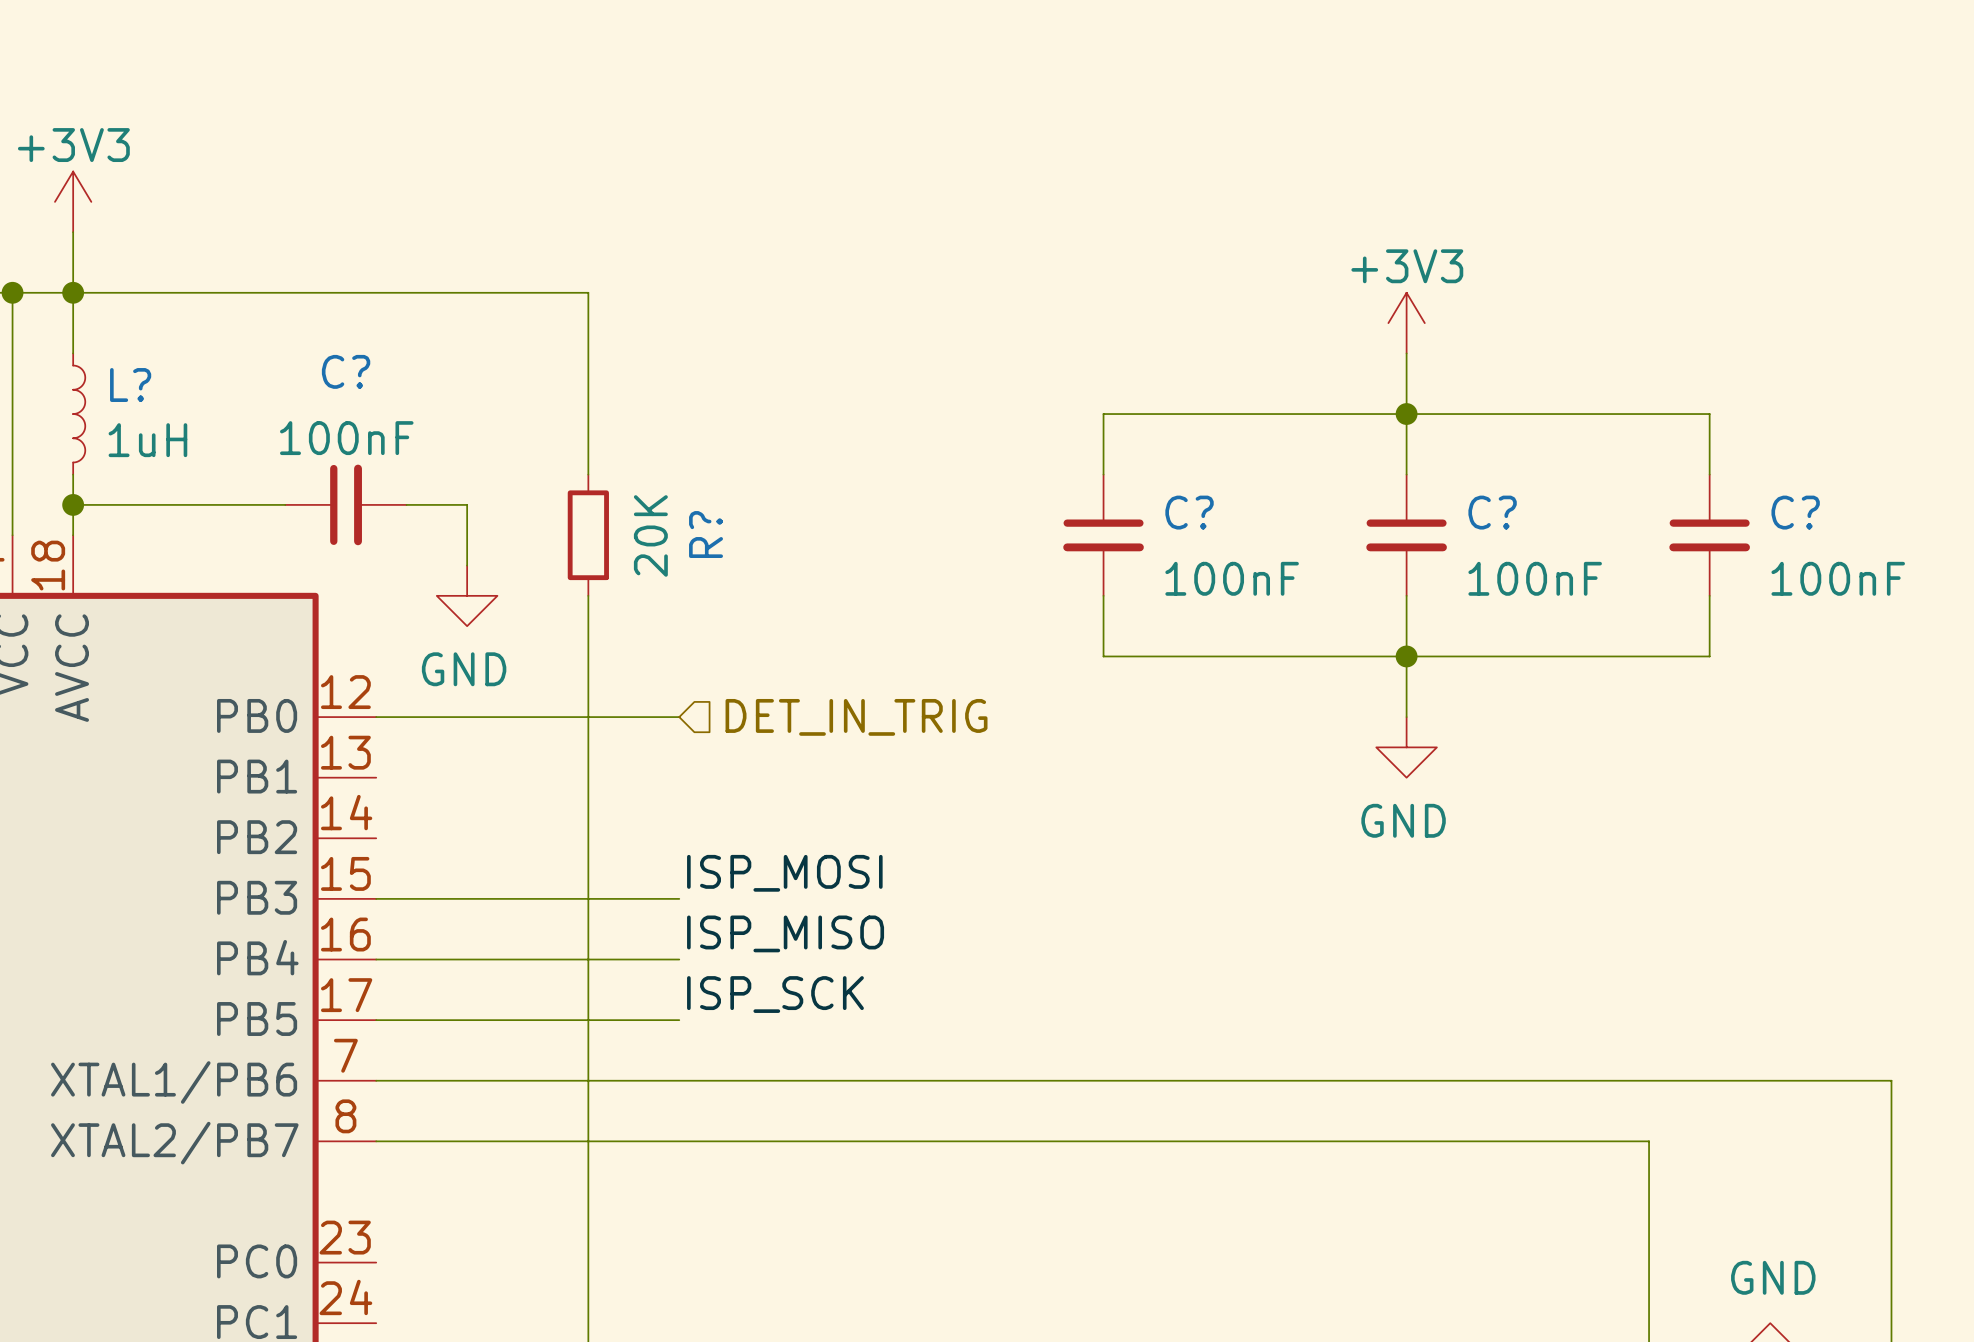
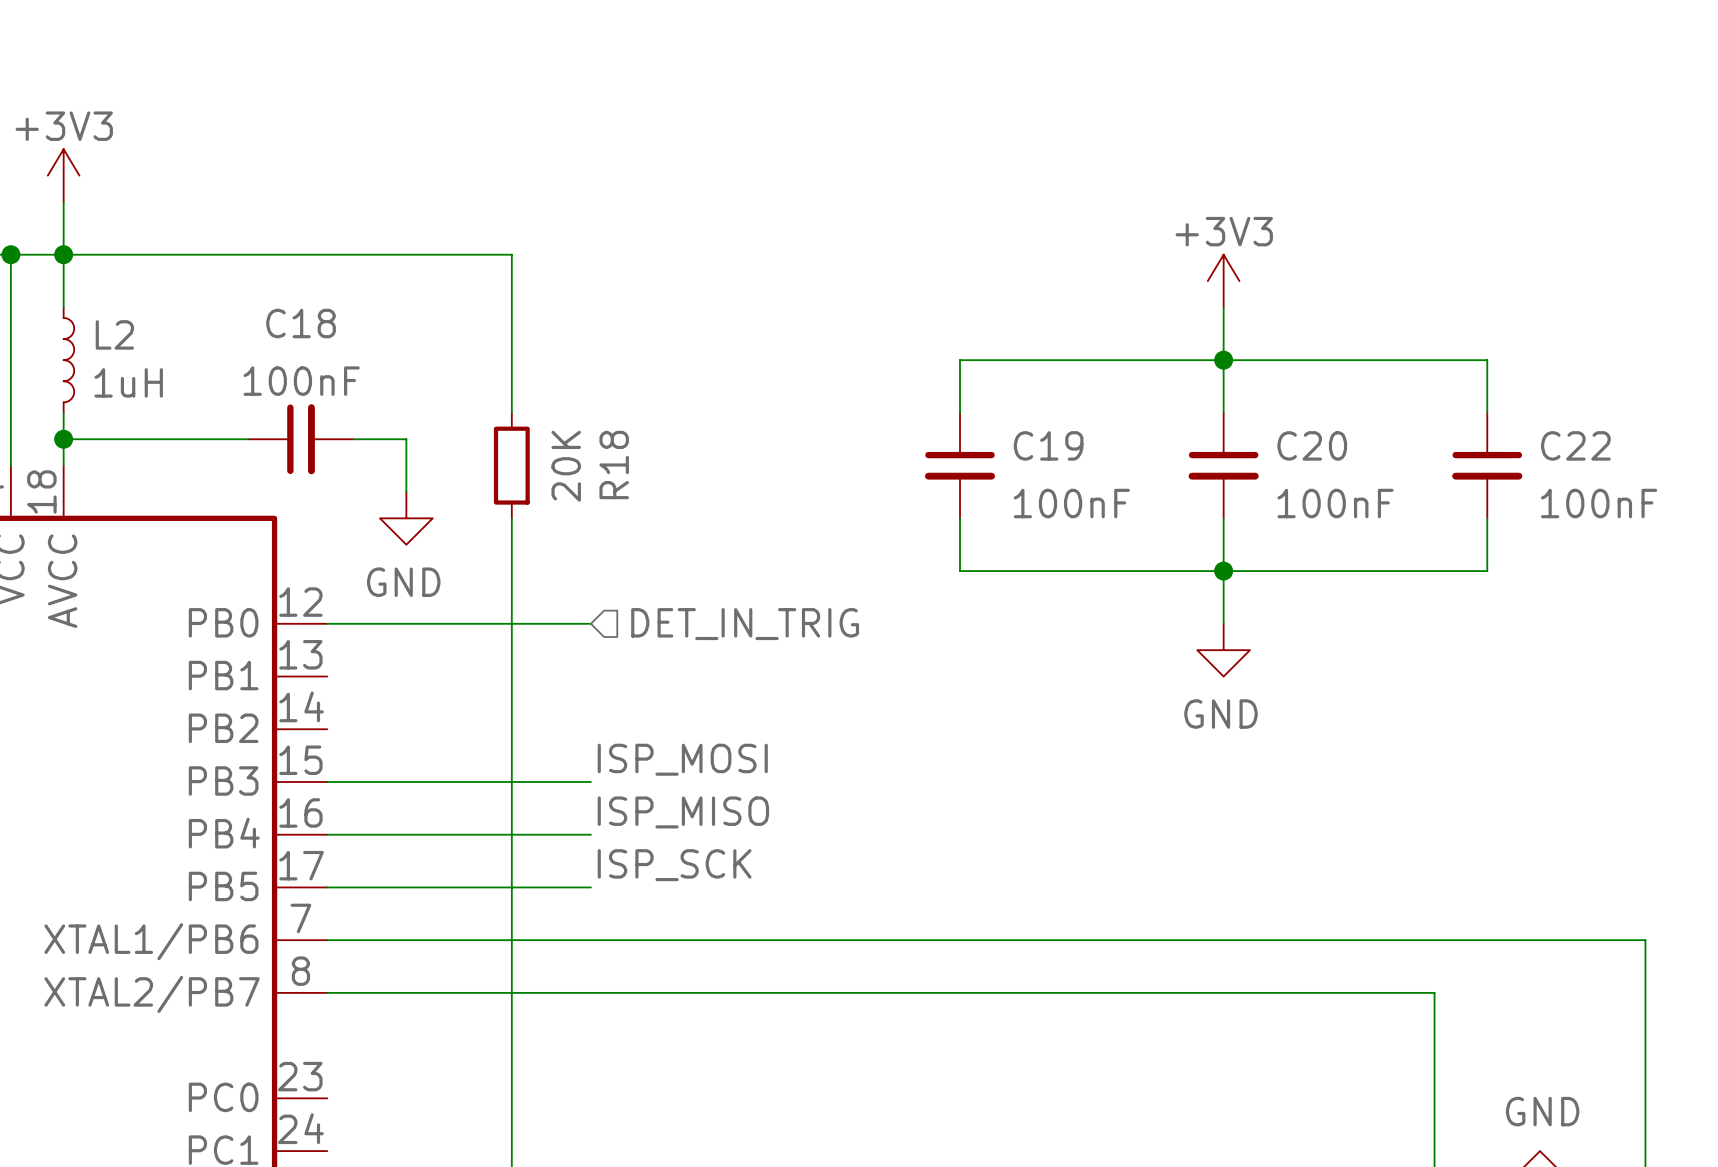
C? name: C? (346, 371) -> C18 (301, 323)
L? name: L? (130, 385) -> L2 (114, 334)
C? name: C? (1189, 512) -> C19 (1048, 445)
C? name: C? (1492, 512) -> C20 (1312, 445)
C? name: C? (1795, 512) -> C22 (1575, 445)
R? name: R? (706, 534) -> R18 (614, 464)

